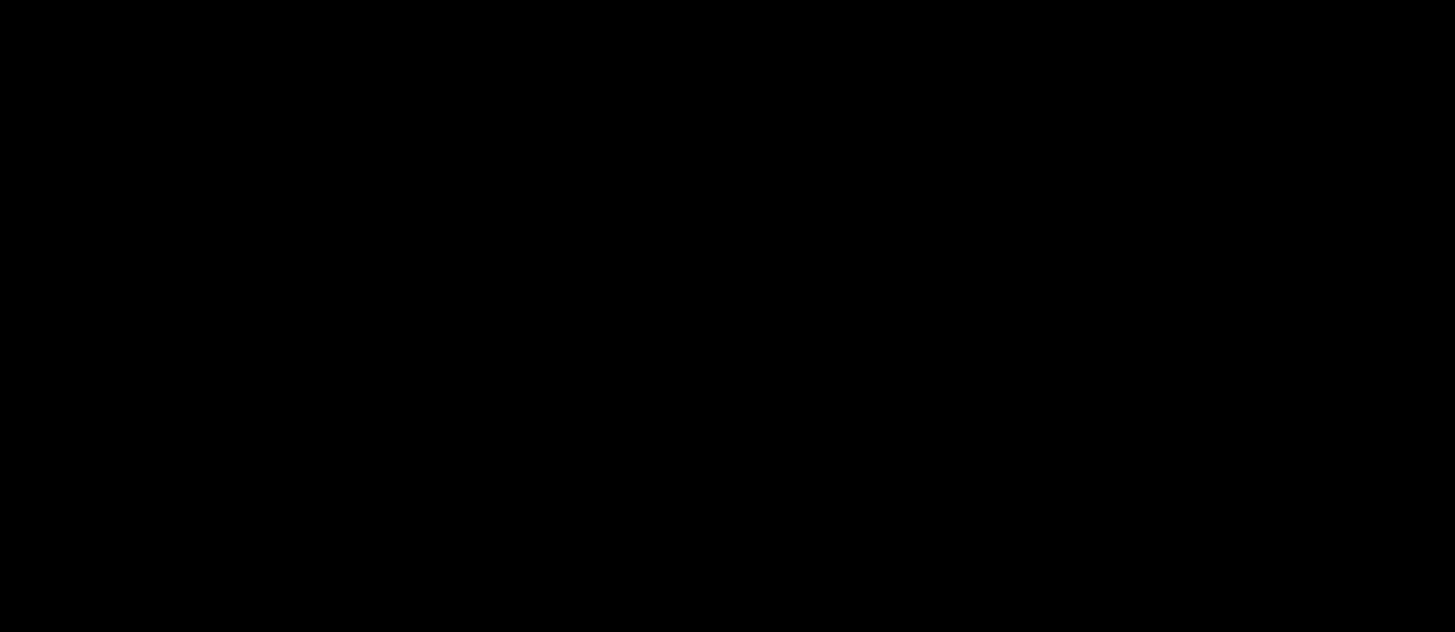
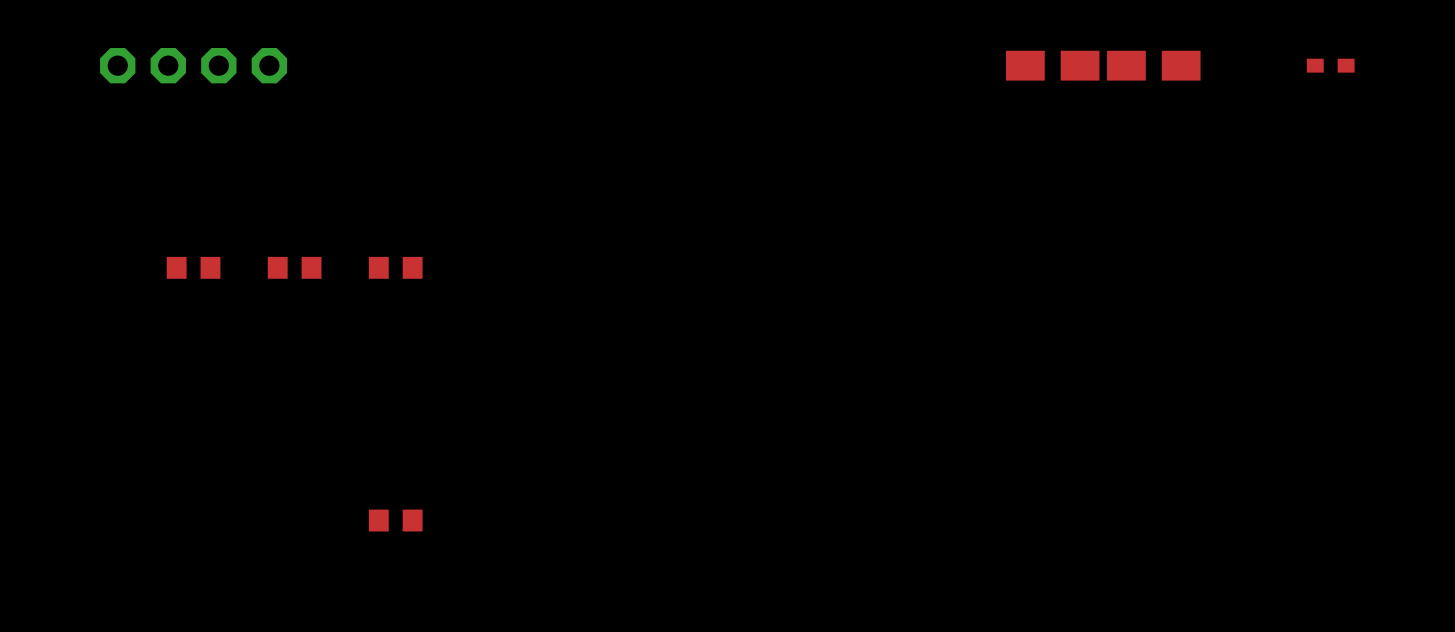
part: none -> (193, 65)
part: none -> (1052, 65)
part: none -> (1153, 65)
part: none -> (1330, 65)
part: none -> (193, 267)
part: none -> (294, 267)
part: none -> (395, 267)
part: none -> (395, 520)

